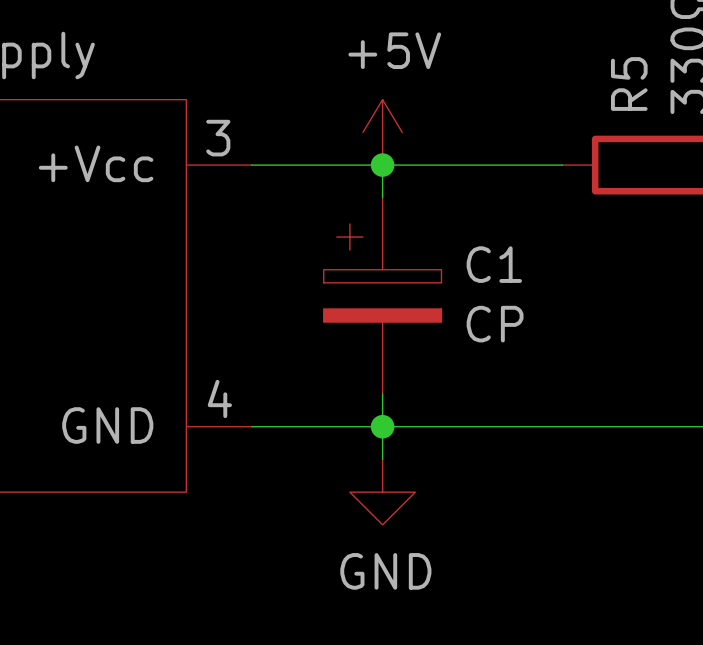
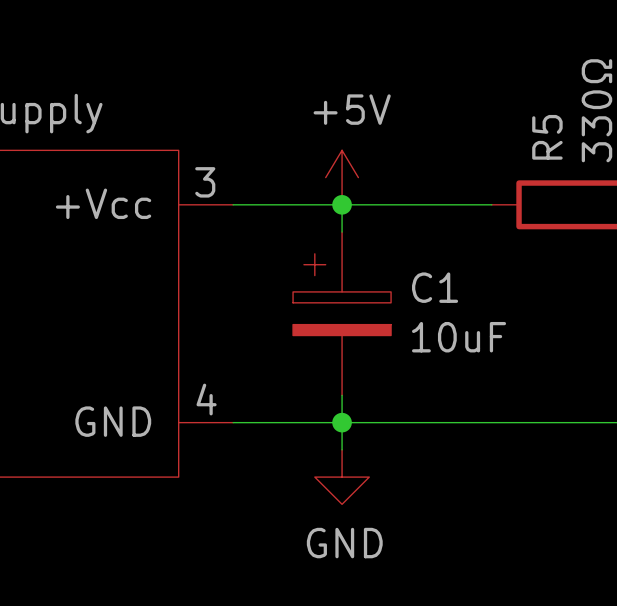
C1 value: CP (495, 324) -> 10uF (459, 337)

